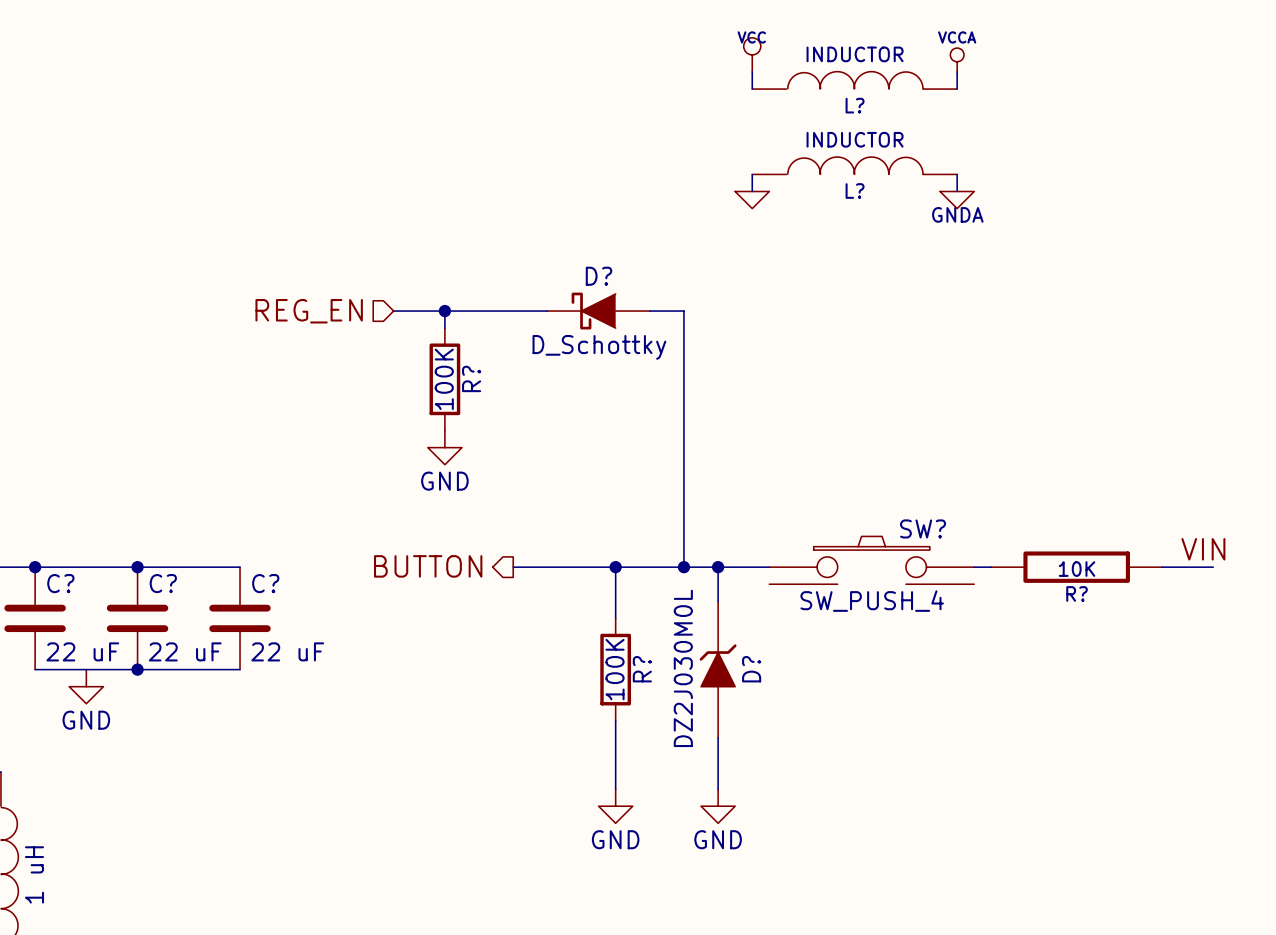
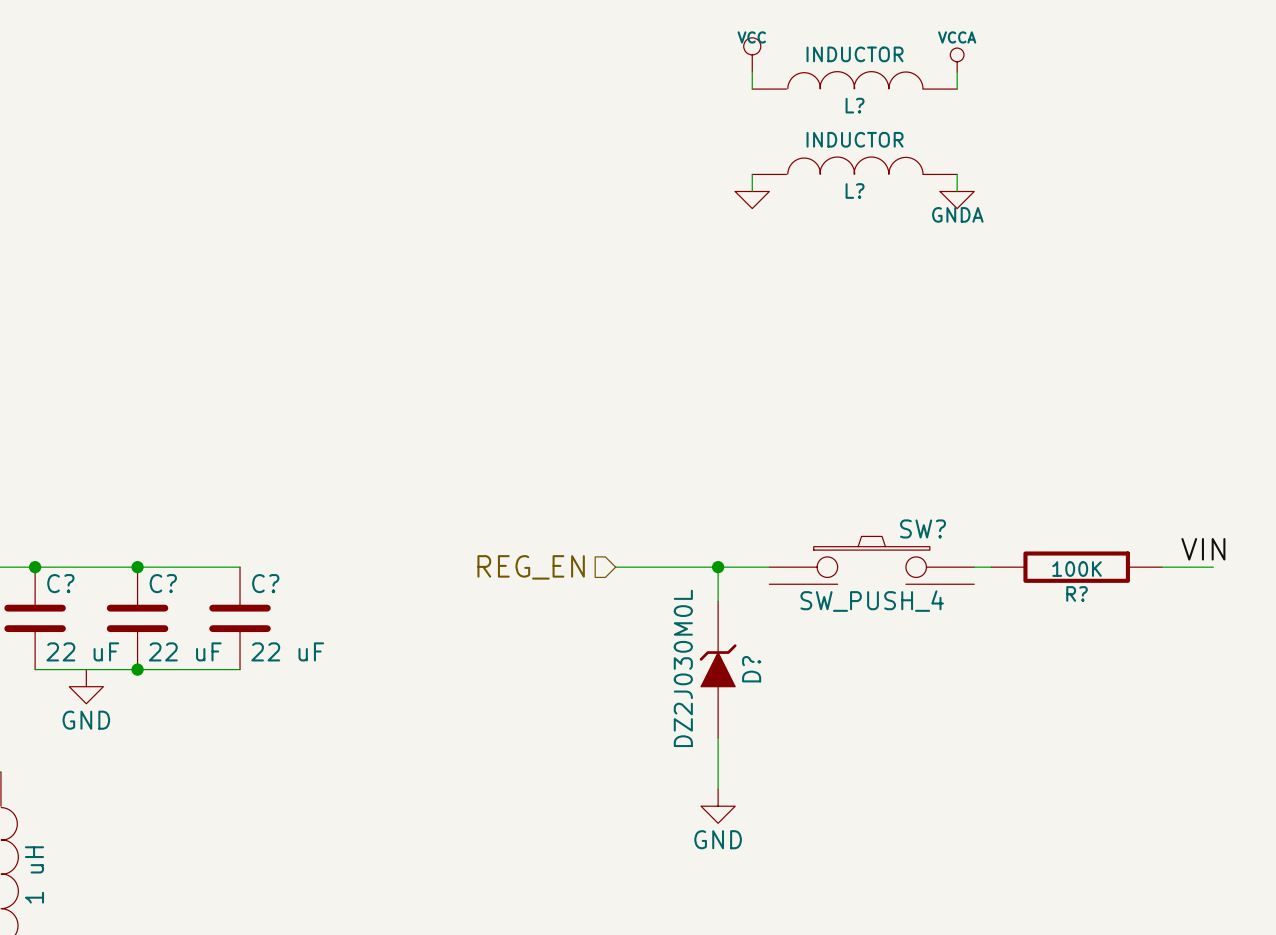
hierarchical label: REG_EN (309, 311) -> none
wire: (393, 311) (547, 311) -> none
wire: (444, 311) (444, 328) -> none
junction: (444, 311) -> none
D?: D_Schottky (598, 311) -> none
wire: (649, 311) (683, 311) (683, 567) -> none
R?: 100K (444, 379) -> none
power symbol: GND (444, 447) -> none
hierarchical label: BUTTON (428, 566) -> none
wire: (513, 567) (615, 567) (615, 618) -> none
hierarchical label: none -> REG_EN (531, 567)
junction: (615, 567) -> none
junction: (683, 567) -> none
R? value: 10K (1077, 569) -> 100K (1077, 569)
R?: 100K (615, 669) -> none
wire: (615, 720) (615, 789) -> none
power symbol: GND (615, 806) -> none

